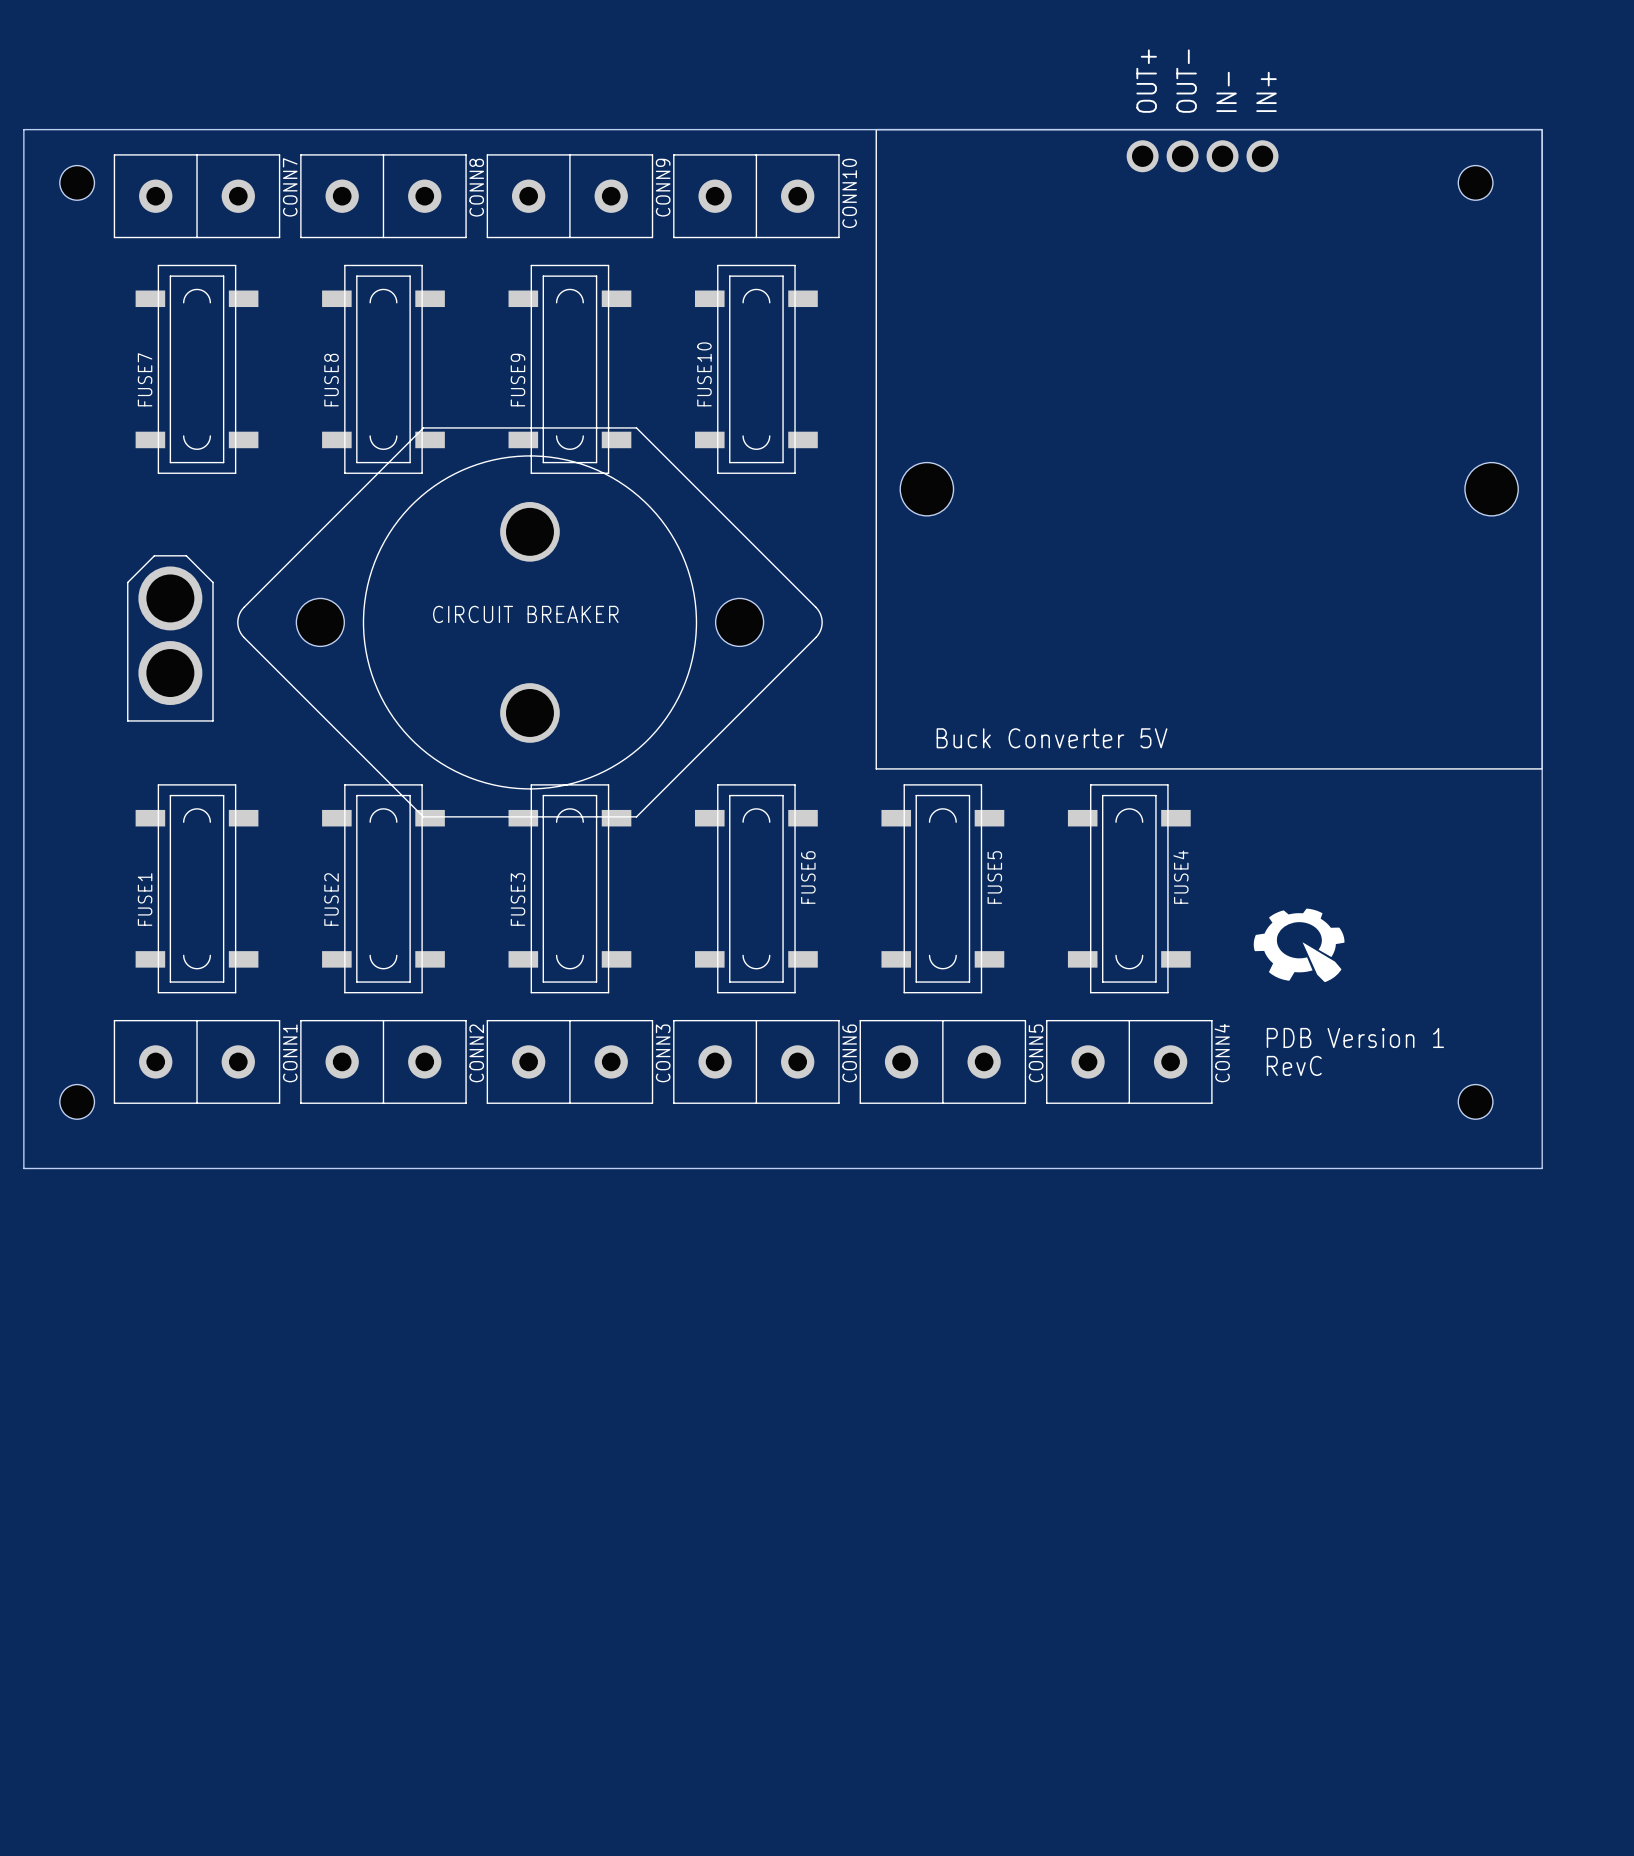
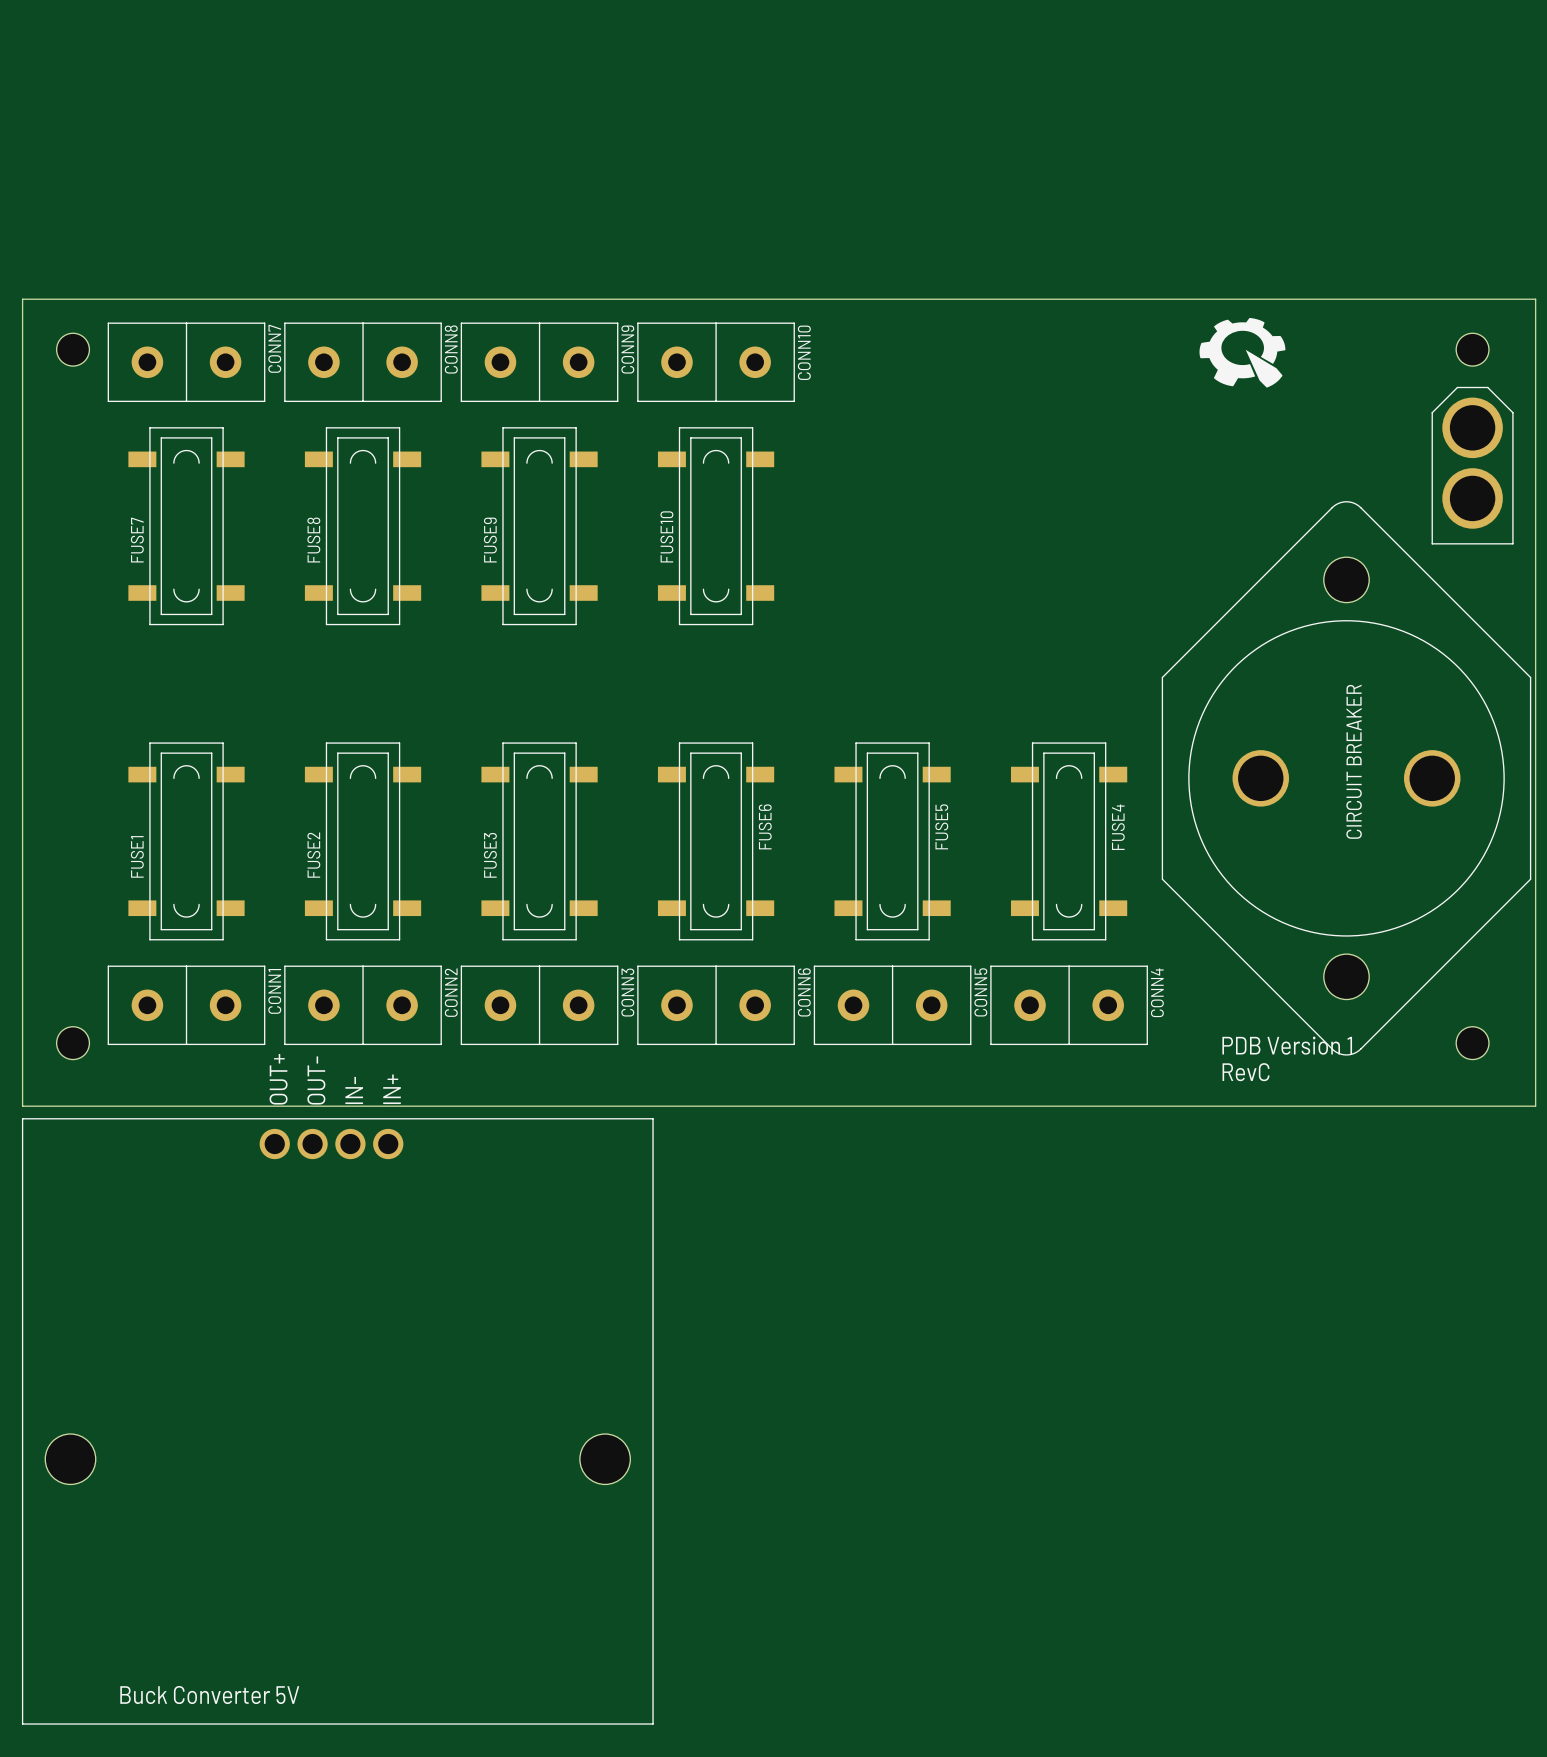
part position: (77, 182) -> (73, 349)
part position: (1475, 182) -> (1472, 349)
CONN7 position: (197, 196) -> (186, 362)
CONN8 position: (383, 196) -> (363, 362)
CONN9 position: (569, 196) -> (539, 362)
CONN10 position: (756, 196) -> (716, 362)
board edge: (23, 316) (23, 129) (1542, 129) (1542, 1168) -> (22, 299) (1535, 299) (1535, 1106) (1459, 1106)
drawing: none -> [1199, 317, 1286, 388]
FUSE7 position: (197, 369) -> (186, 526)
FUSE8 position: (383, 369) -> (363, 526)
FUSE9 position: (569, 369) -> (539, 526)
FUSE10 position: (756, 369) -> (716, 526)
part: (1209, 449) -> none
part: none -> (1472, 465)
part: (529, 622) -> none
part: (170, 638) -> none
part: none -> (1346, 778)
drawing: [1253, 908, 1345, 983] -> none
text position: PDB Version 1 (1355, 1037) -> PDB Version 1 (1287, 1045)
text position: RevC (1294, 1065) -> RevC (1246, 1072)
part position: (1475, 1101) -> (1472, 1043)
part: none -> (337, 1421)

